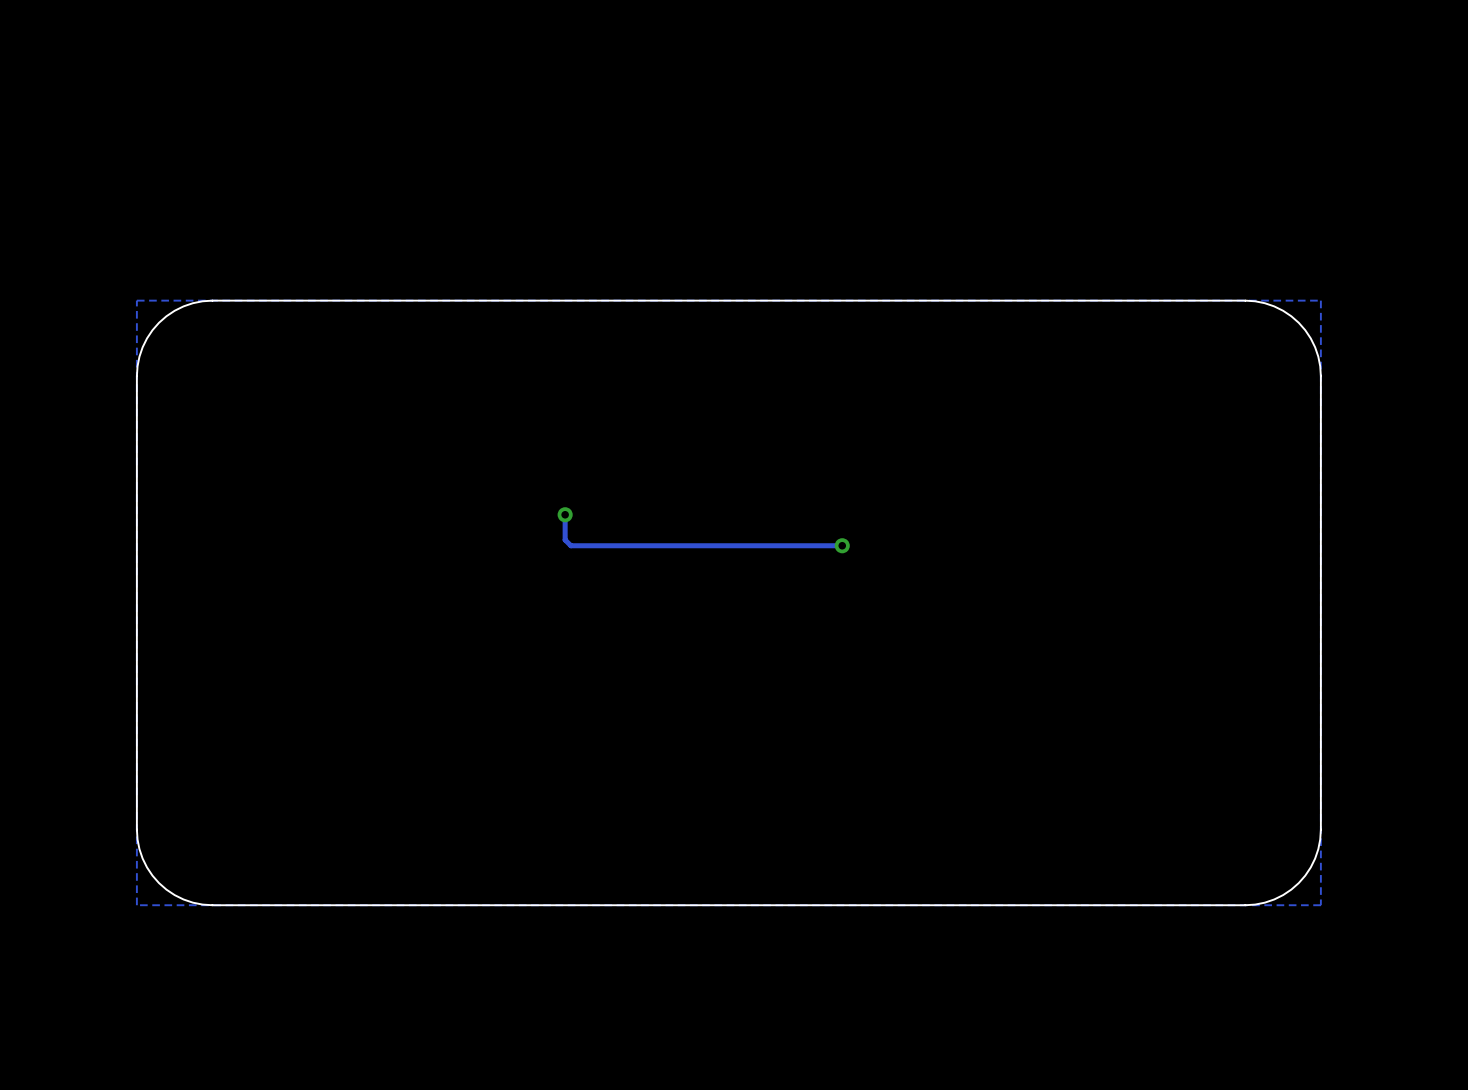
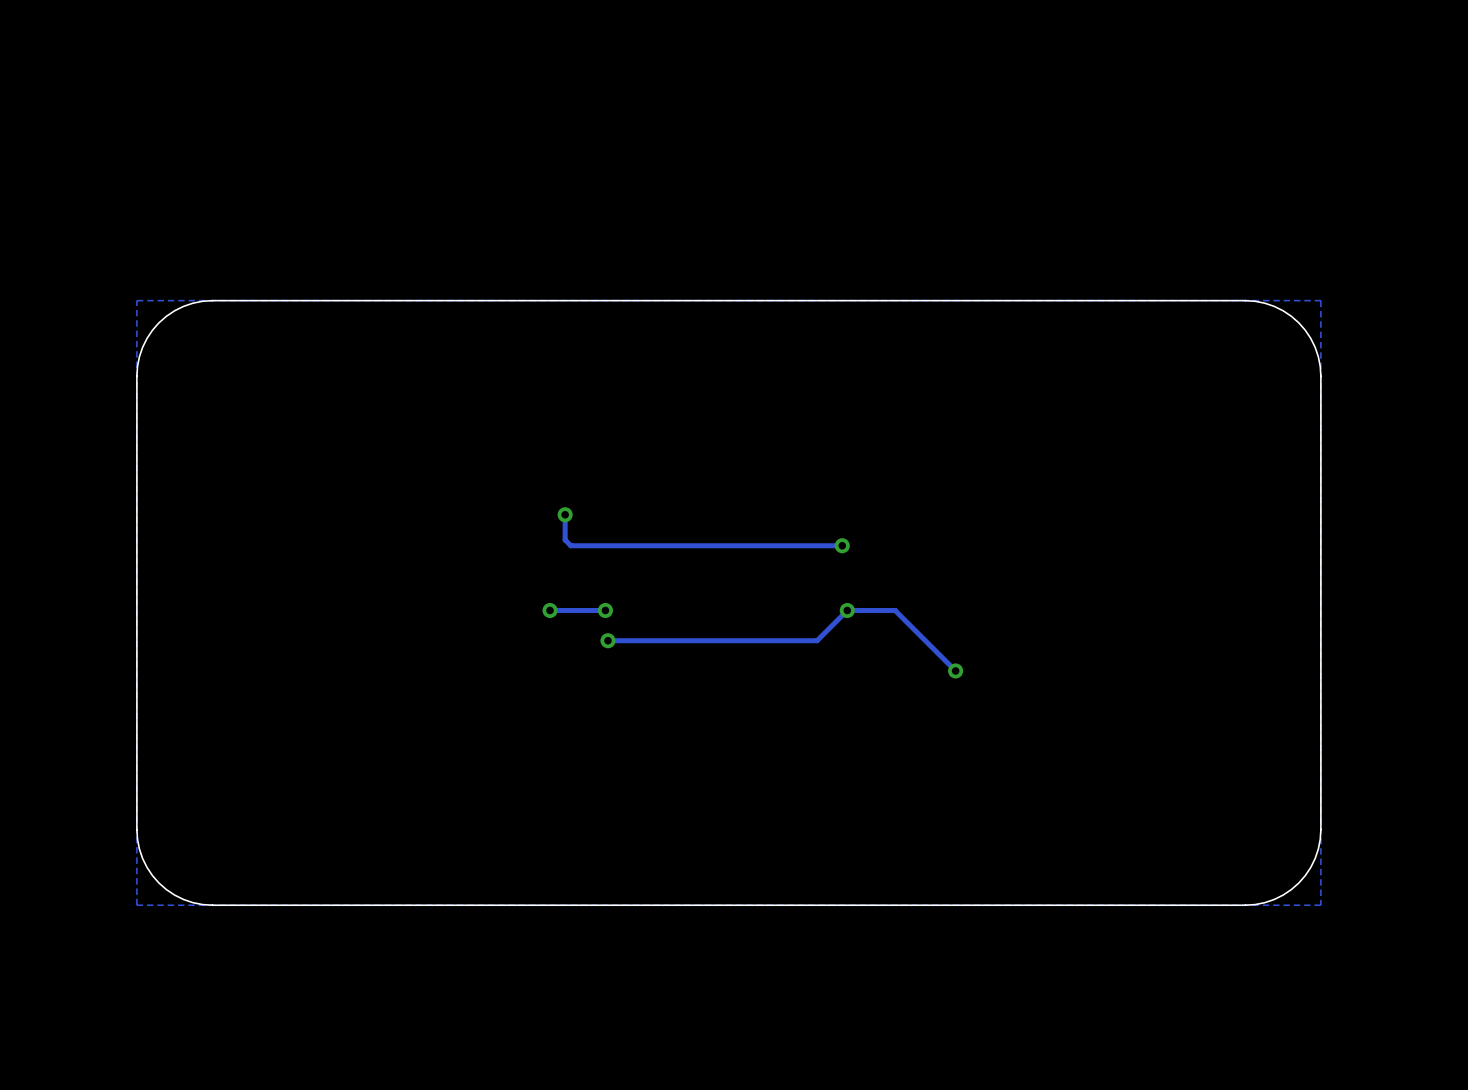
via: none -> (550, 610)
track: none -> (605, 610) (550, 610)
via: none -> (605, 610)
via: none -> (847, 610)
track: none -> (607, 640) (817, 640) (847, 610) (895, 610) (955, 670)
via: none -> (607, 640)
via: none -> (955, 670)

